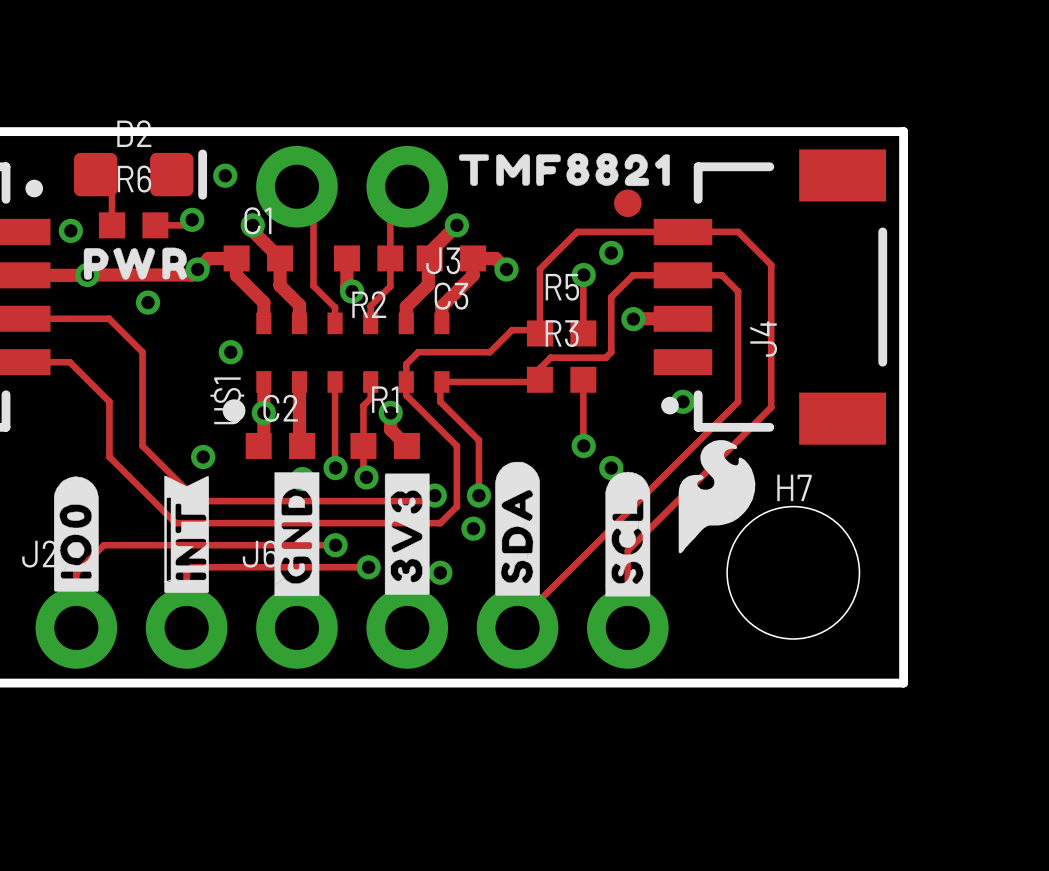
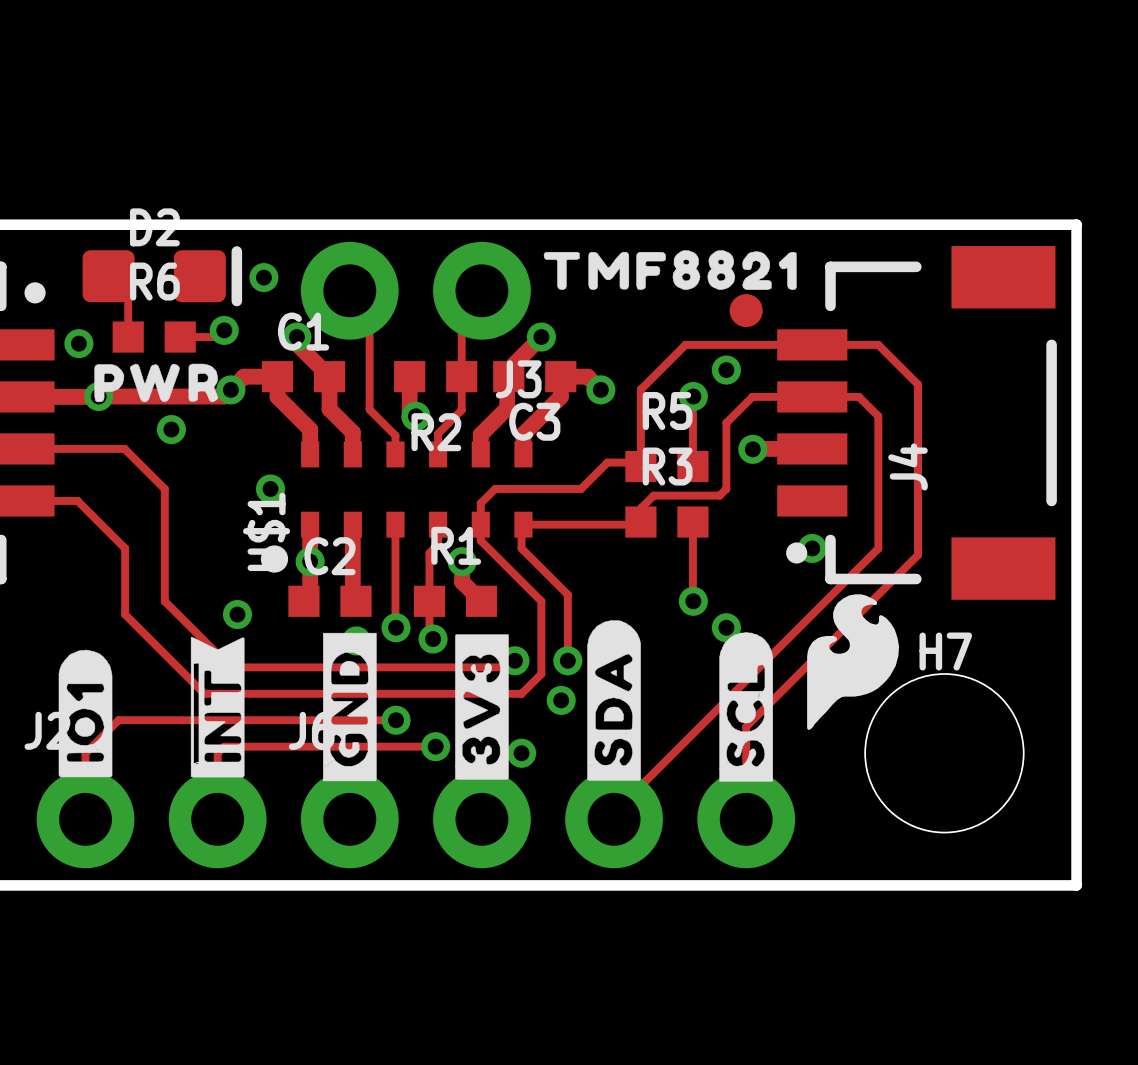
drawing shape: [53, 476, 99, 592] -> [58, 649, 113, 778]

